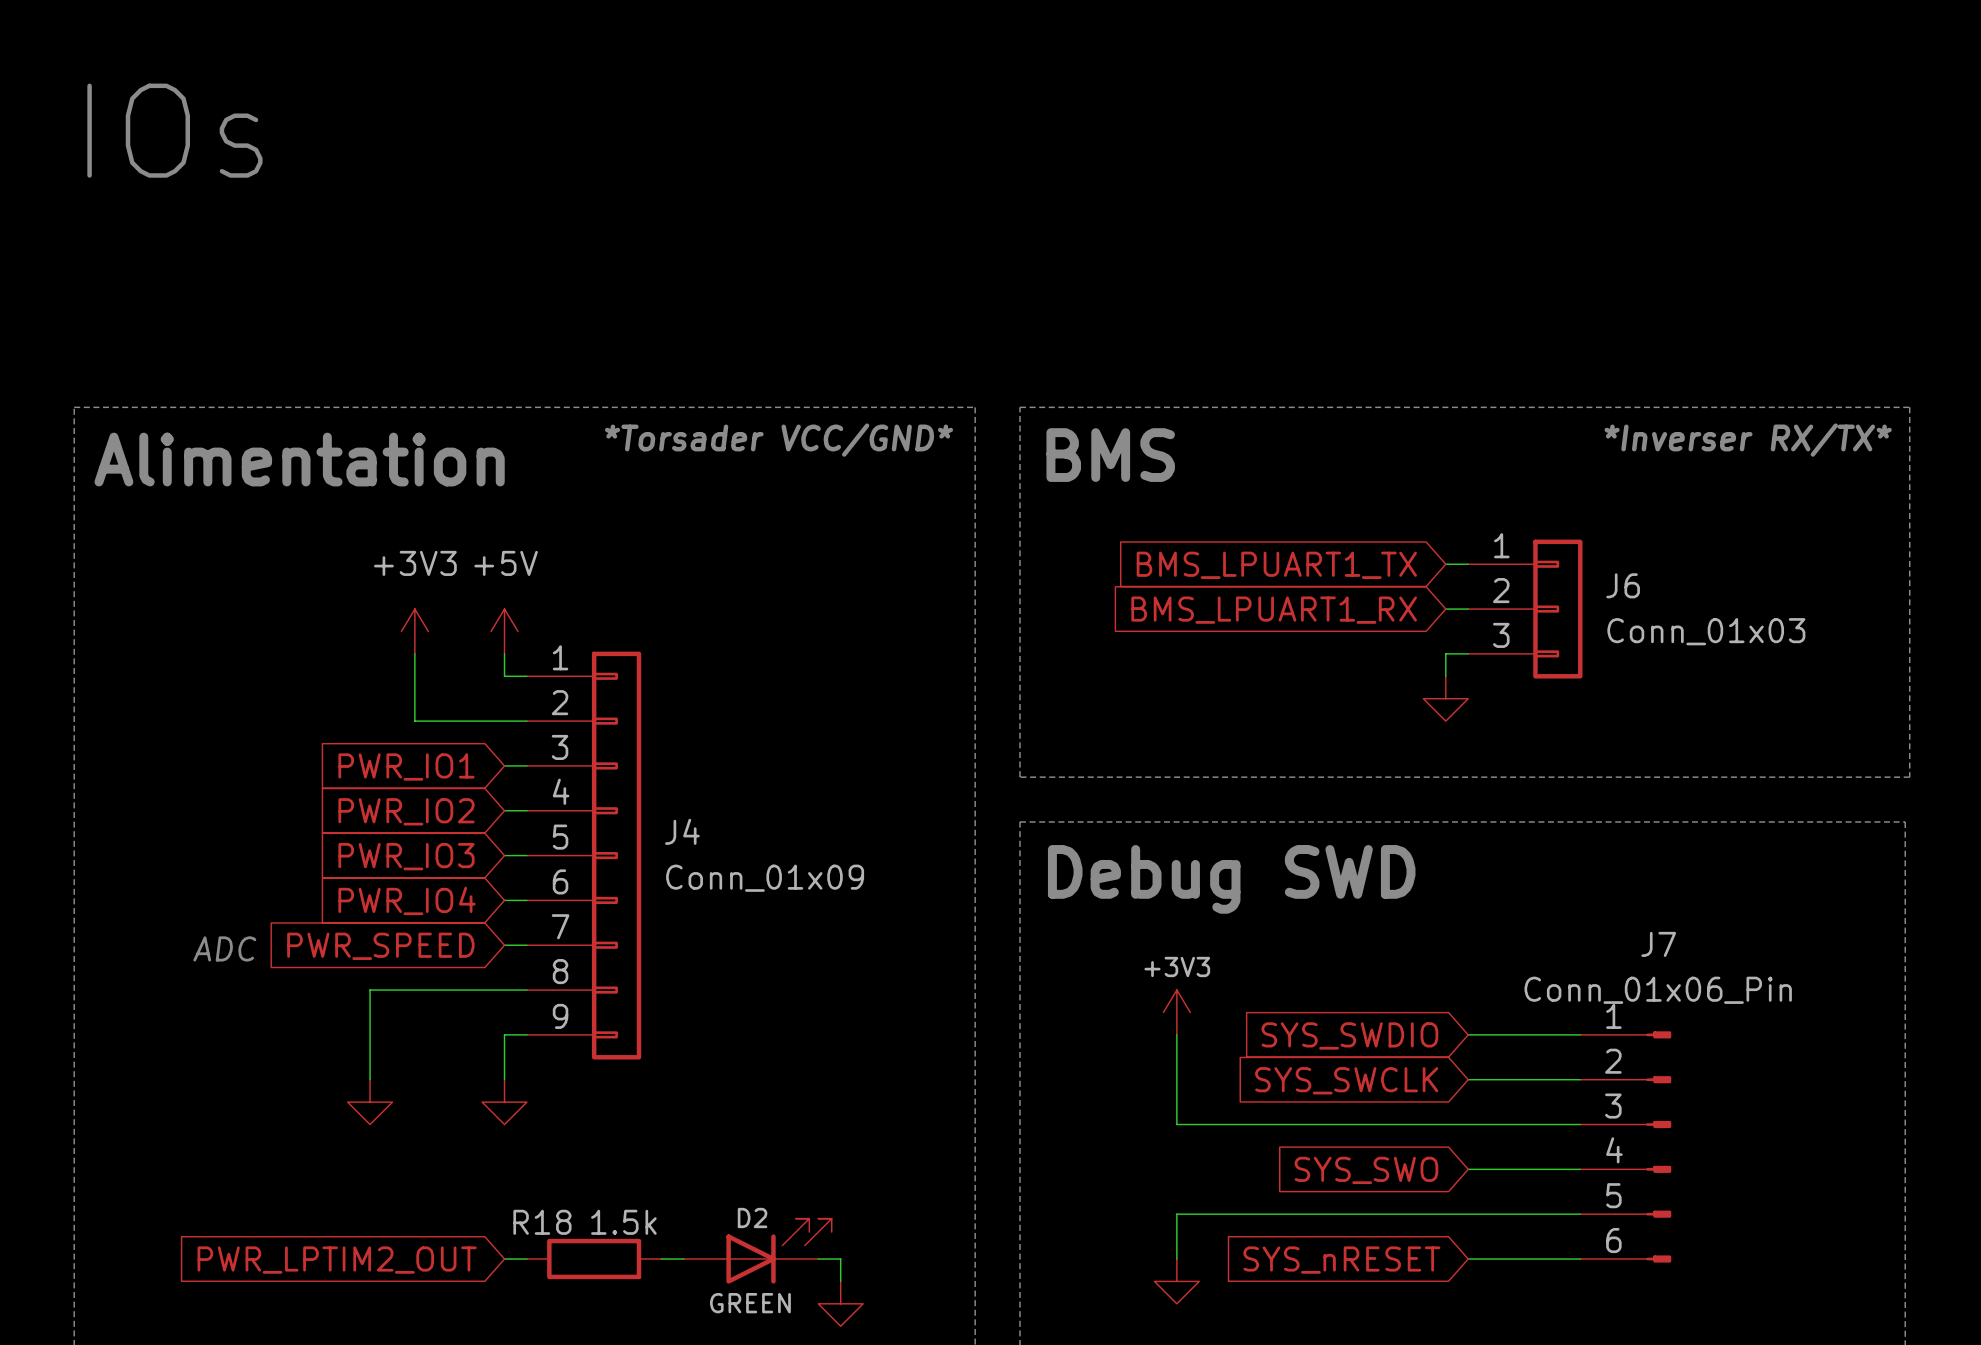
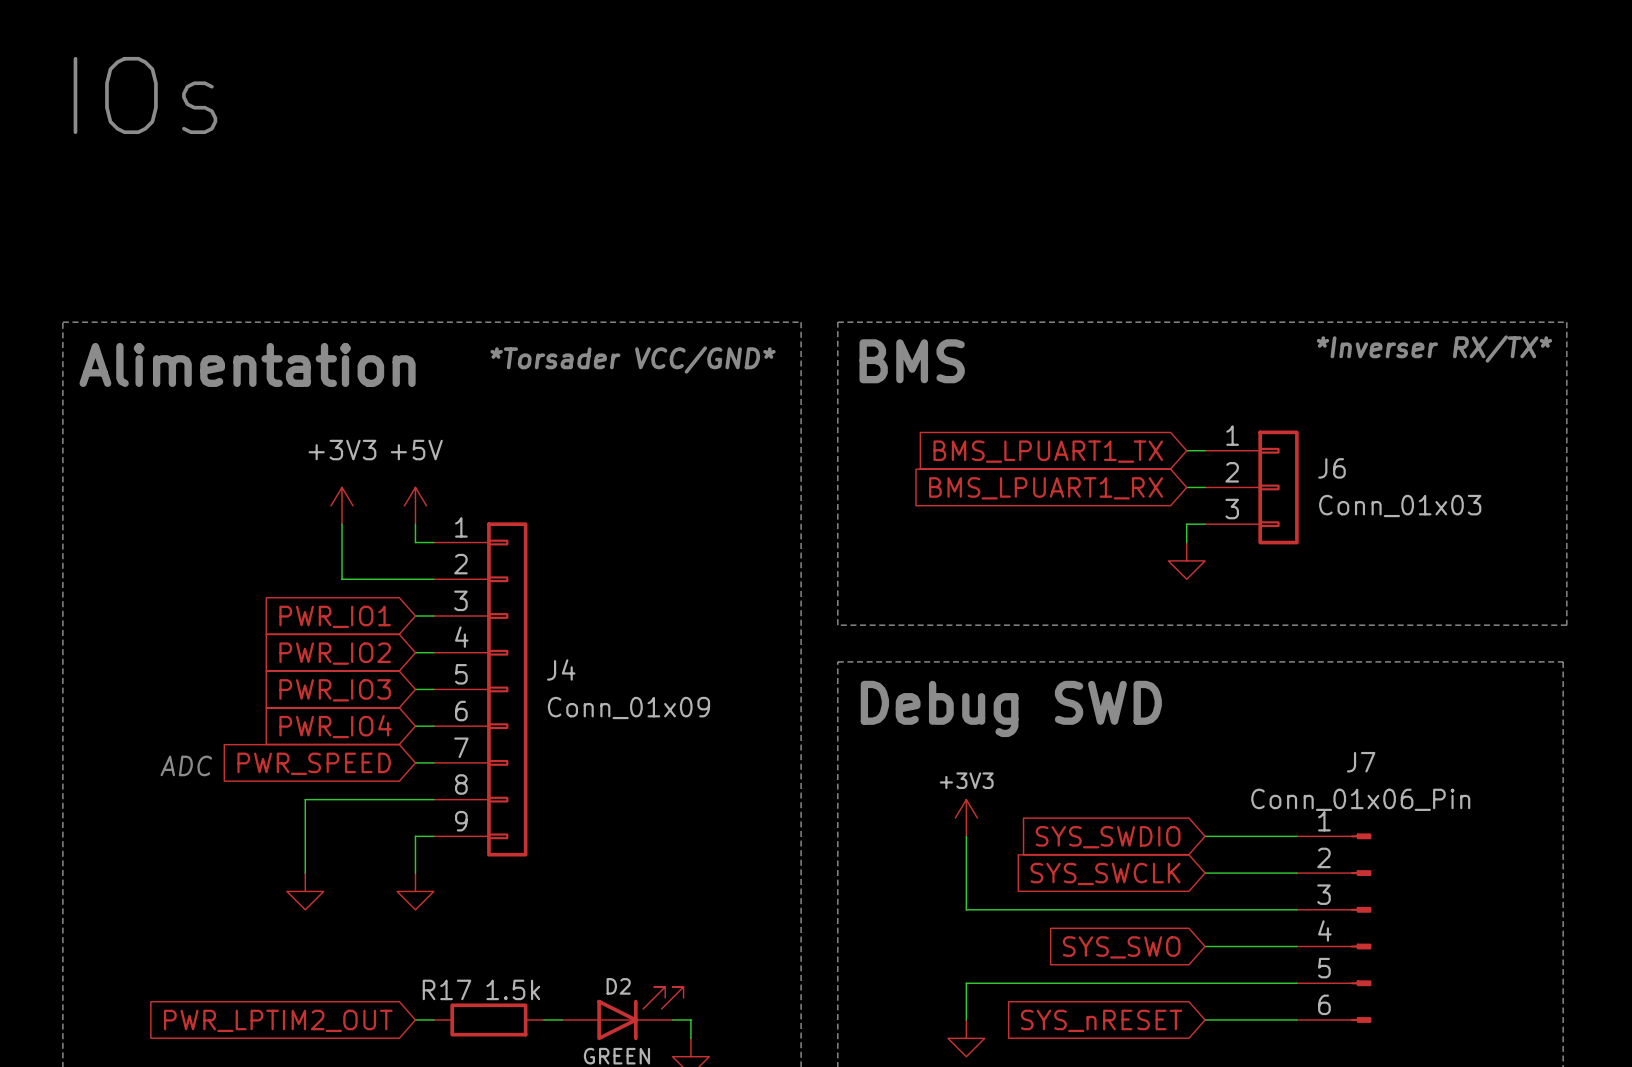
text position: *Torsader VCC/GND* (779, 440) -> *Torsader VCC/GND* (633, 360)
R18 name: R18 (542, 1222) -> R17 (446, 989)

